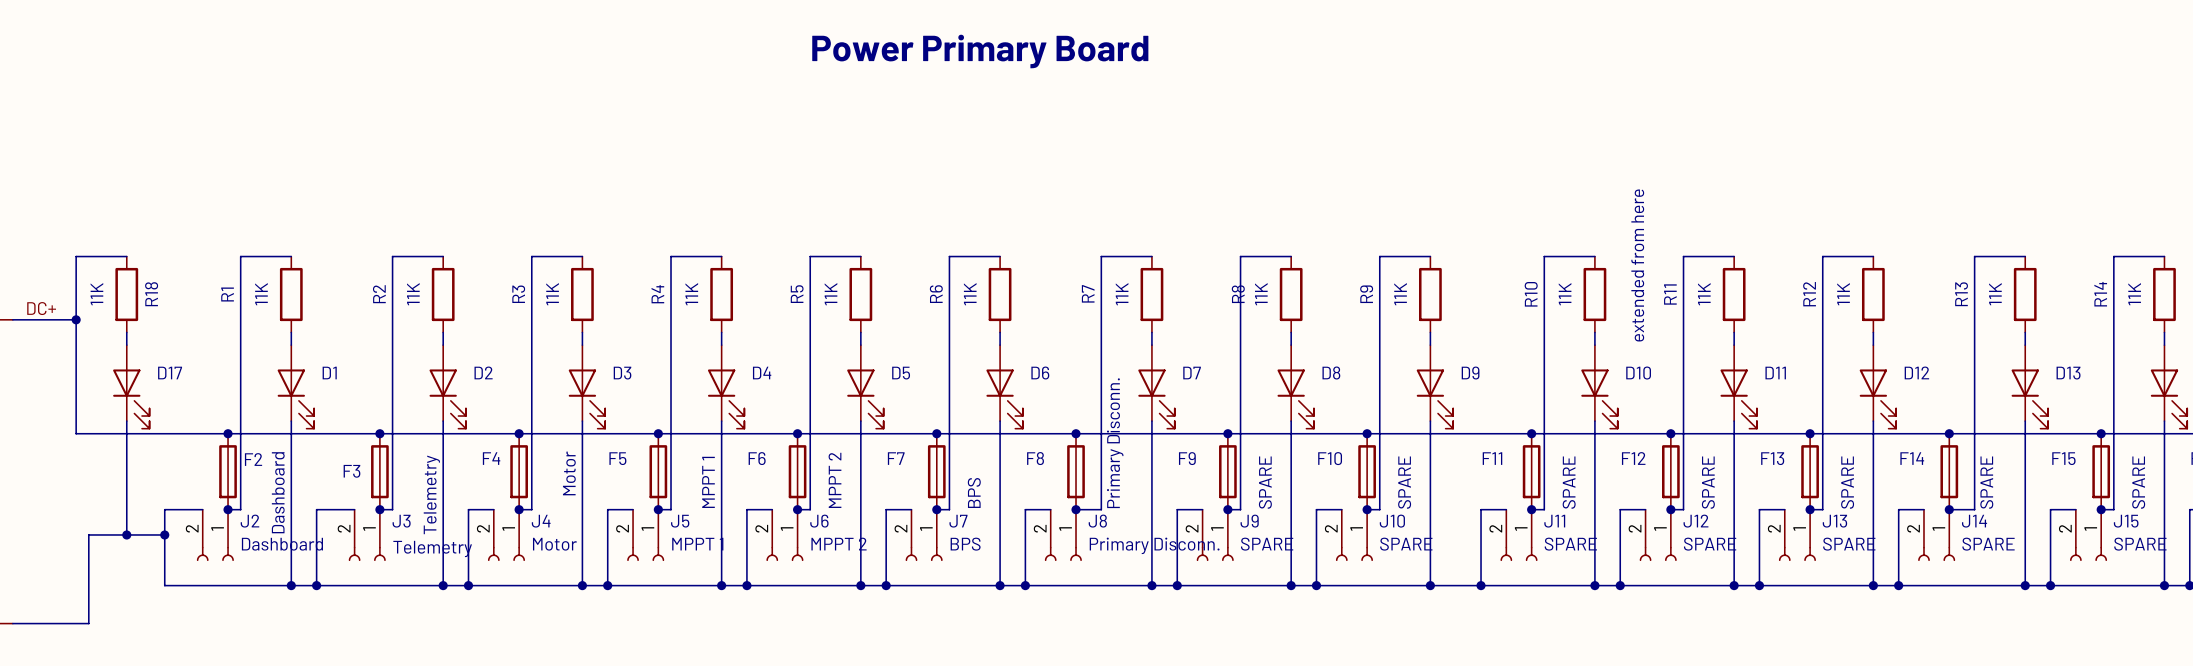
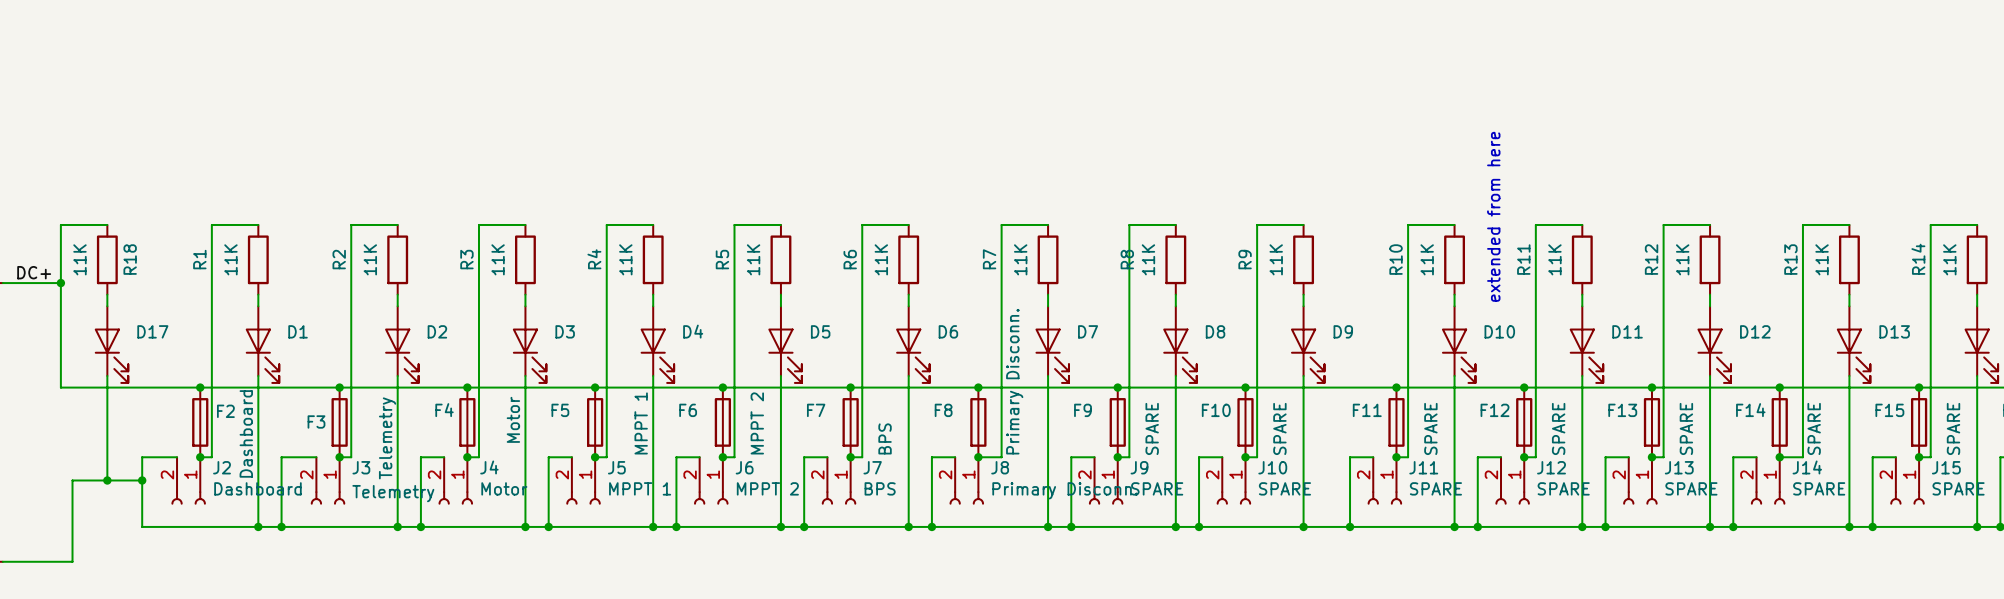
text: Power Primary Board (980, 51) -> none

